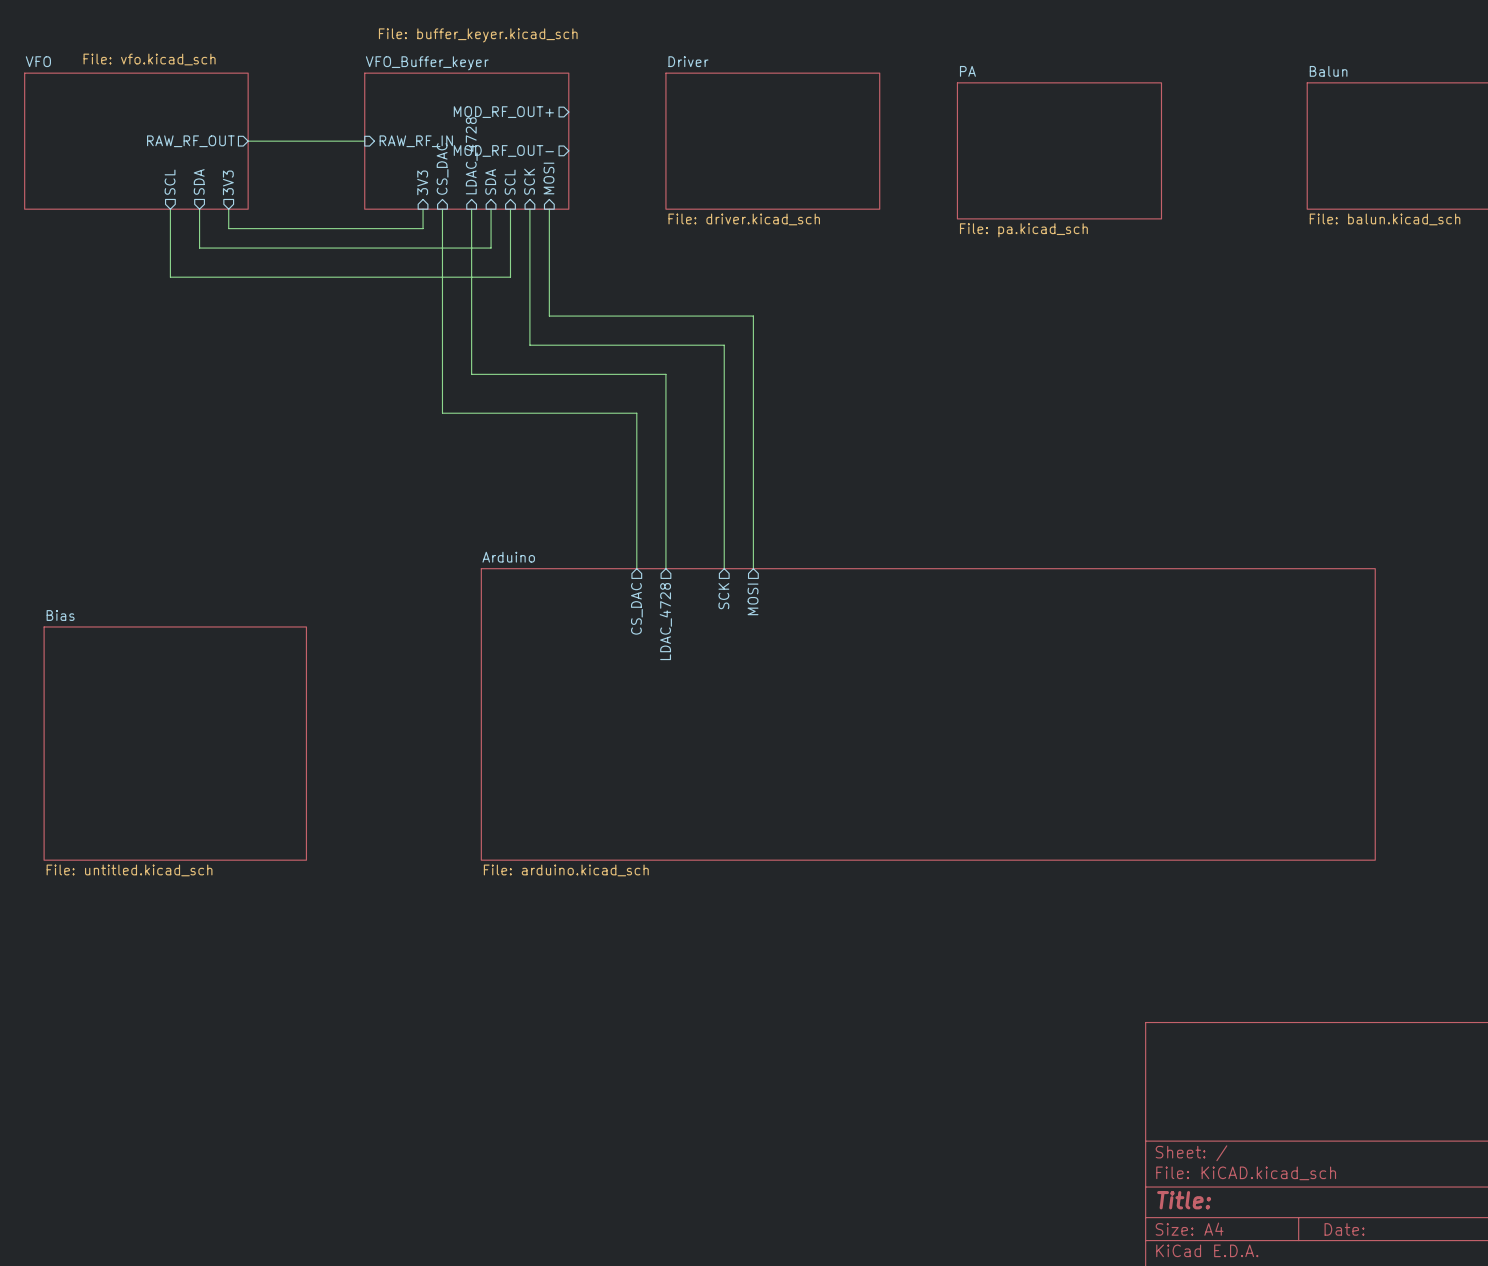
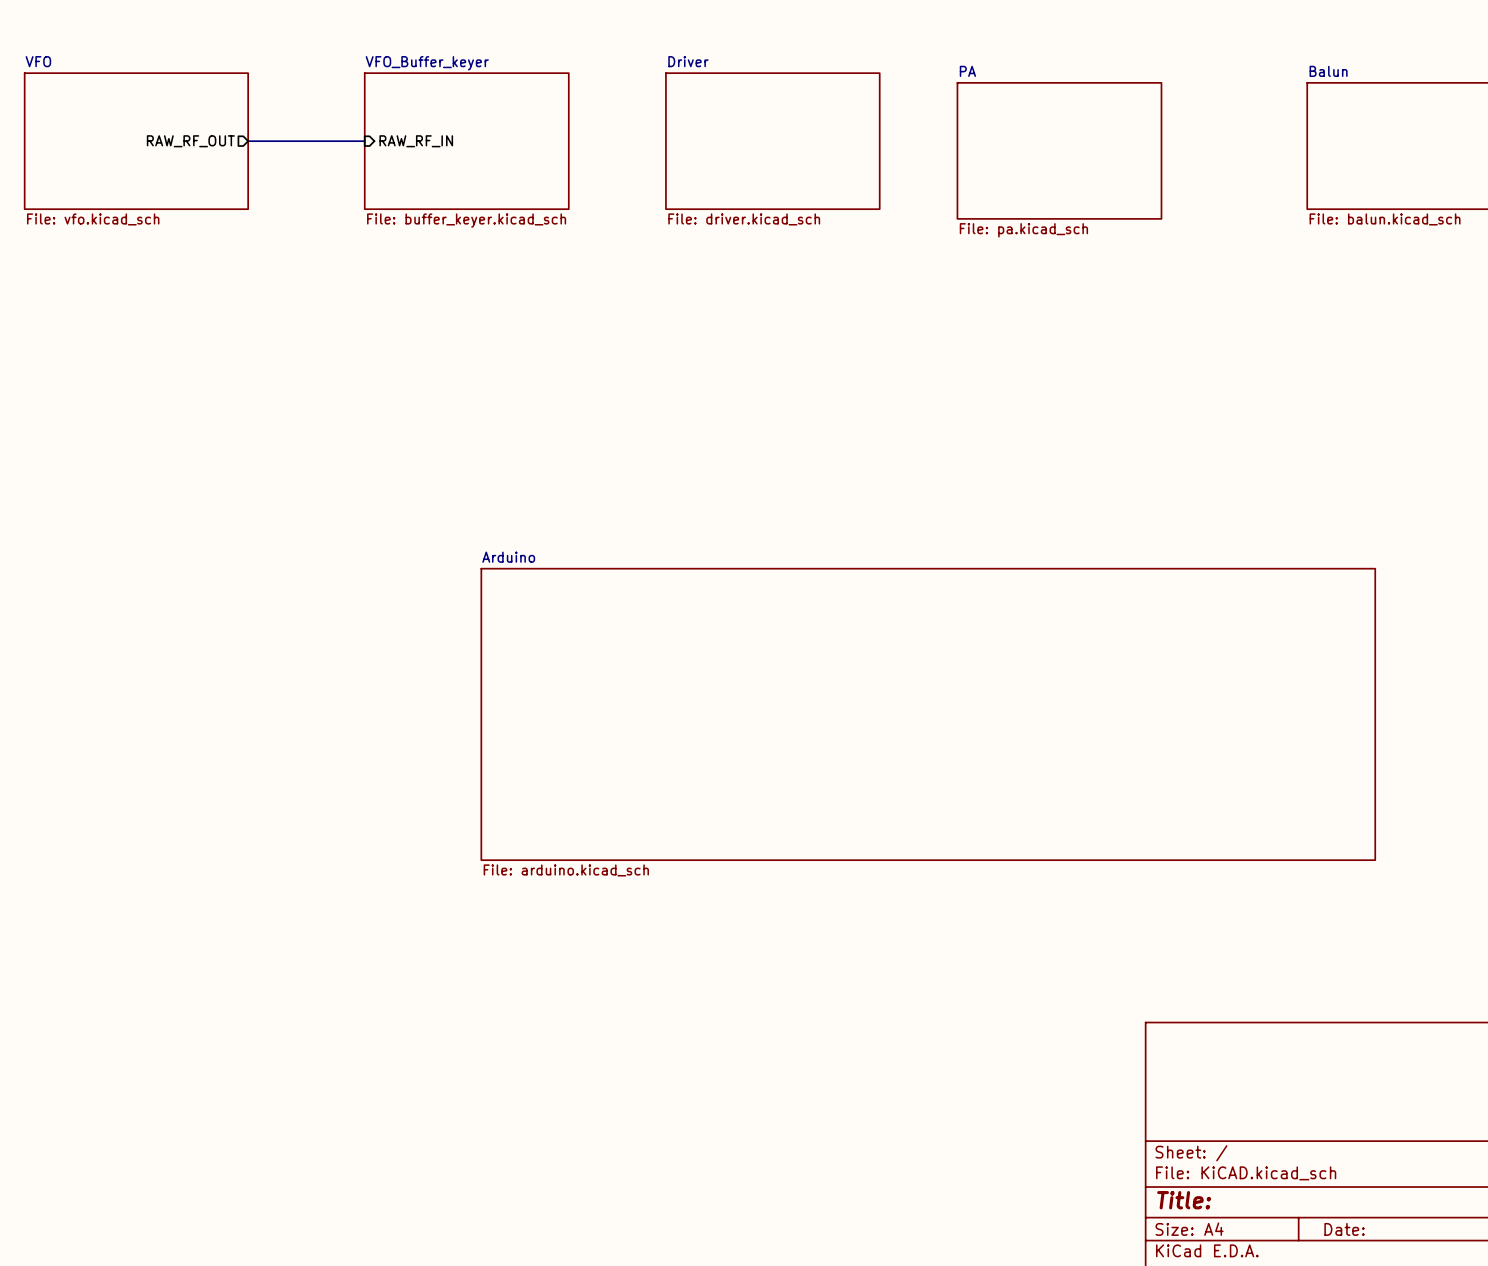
sheet VFO_Buffer_keyer value position: File: buffer_keyer.kicad_sch (478, 35) -> File: buffer_keyer.kicad_sch (466, 220)
sheet VFO value position: File: vfo.kicad_sch (149, 59) -> File: vfo.kicad_sch (93, 219)
sheet pin: MOD_RF_OUT+ (503, 112) -> none
sheet pin: MOD_RF_OUT- (503, 150) -> none
sheet pin: LDAC_4728 (471, 155) -> none
sheet pin: CS_DAC (442, 169) -> none
sheet pin: MOSI (548, 178) -> none
sheet pin: SDA (199, 181) -> none
sheet pin: SDA (490, 181) -> none
sheet pin: SCK (529, 181) -> none
sheet pin: SCL (170, 182) -> none
sheet pin: 3V3 (228, 182) -> none
sheet pin: 3V3 (422, 182) -> none
sheet pin: SCL (510, 182) -> none
wire: (170, 209) (170, 277) (510, 277) (510, 209) -> none
wire: (199, 209) (199, 248) (491, 248) (491, 209) -> none
wire: (228, 209) (228, 228) (423, 228) (423, 209) -> none
wire: (442, 209) (442, 413) (636, 413) (636, 568) -> none
wire: (471, 209) (471, 374) (665, 374) (665, 568) -> none
wire: (529, 209) (529, 345) (724, 345) (724, 568) -> none
wire: (549, 209) (549, 316) (753, 316) (753, 568) -> none
sheet pin: SCK (723, 596) -> none
sheet pin: MOSI (753, 599) -> none
sheet pin: CS_DAC (636, 608) -> none
sheet pin: LDAC_4728 (665, 621) -> none
sheet Bias: File: untitled.kicad_sch (175, 743) -> none

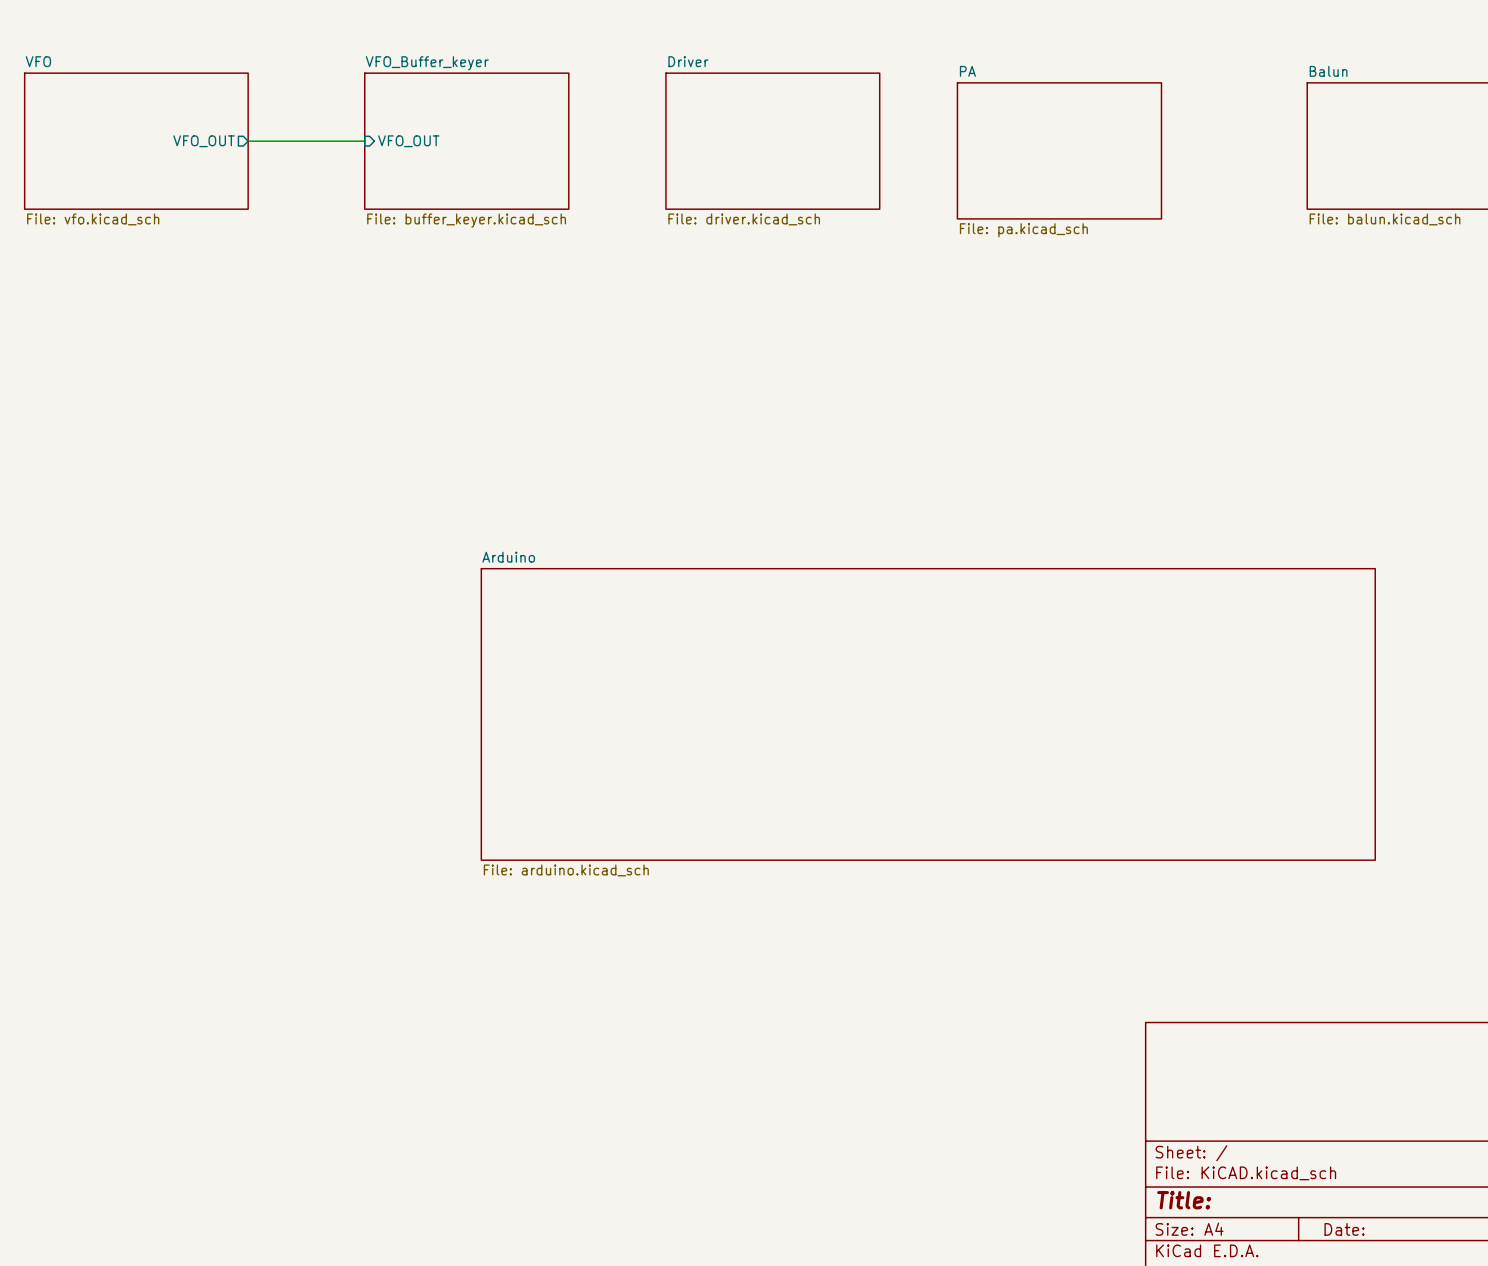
sheet pin: RAW_RF_OUT (190, 141) -> VFO_OUT (204, 141)
sheet pin: RAW_RF_IN (416, 141) -> VFO_OUT (408, 141)

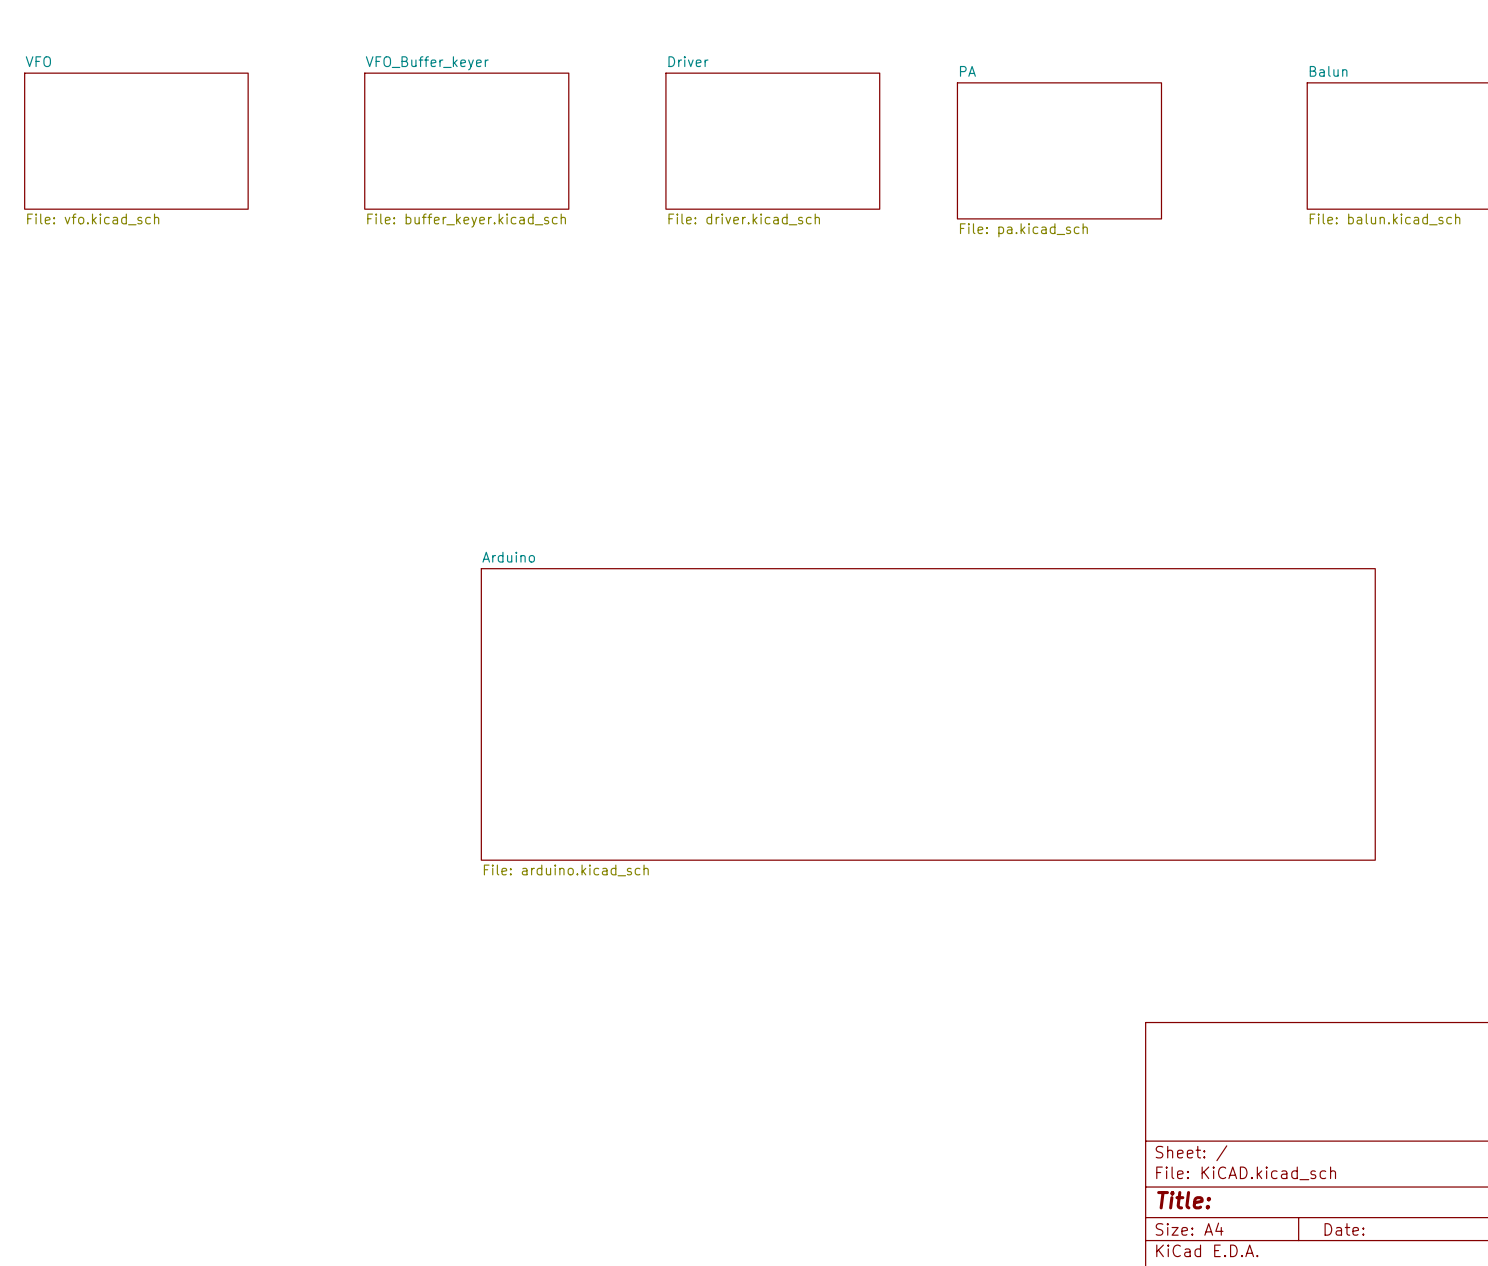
sheet pin: VFO_OUT (204, 141) -> none
wire: (248, 141) (364, 141) -> none
sheet pin: VFO_OUT (408, 141) -> none

